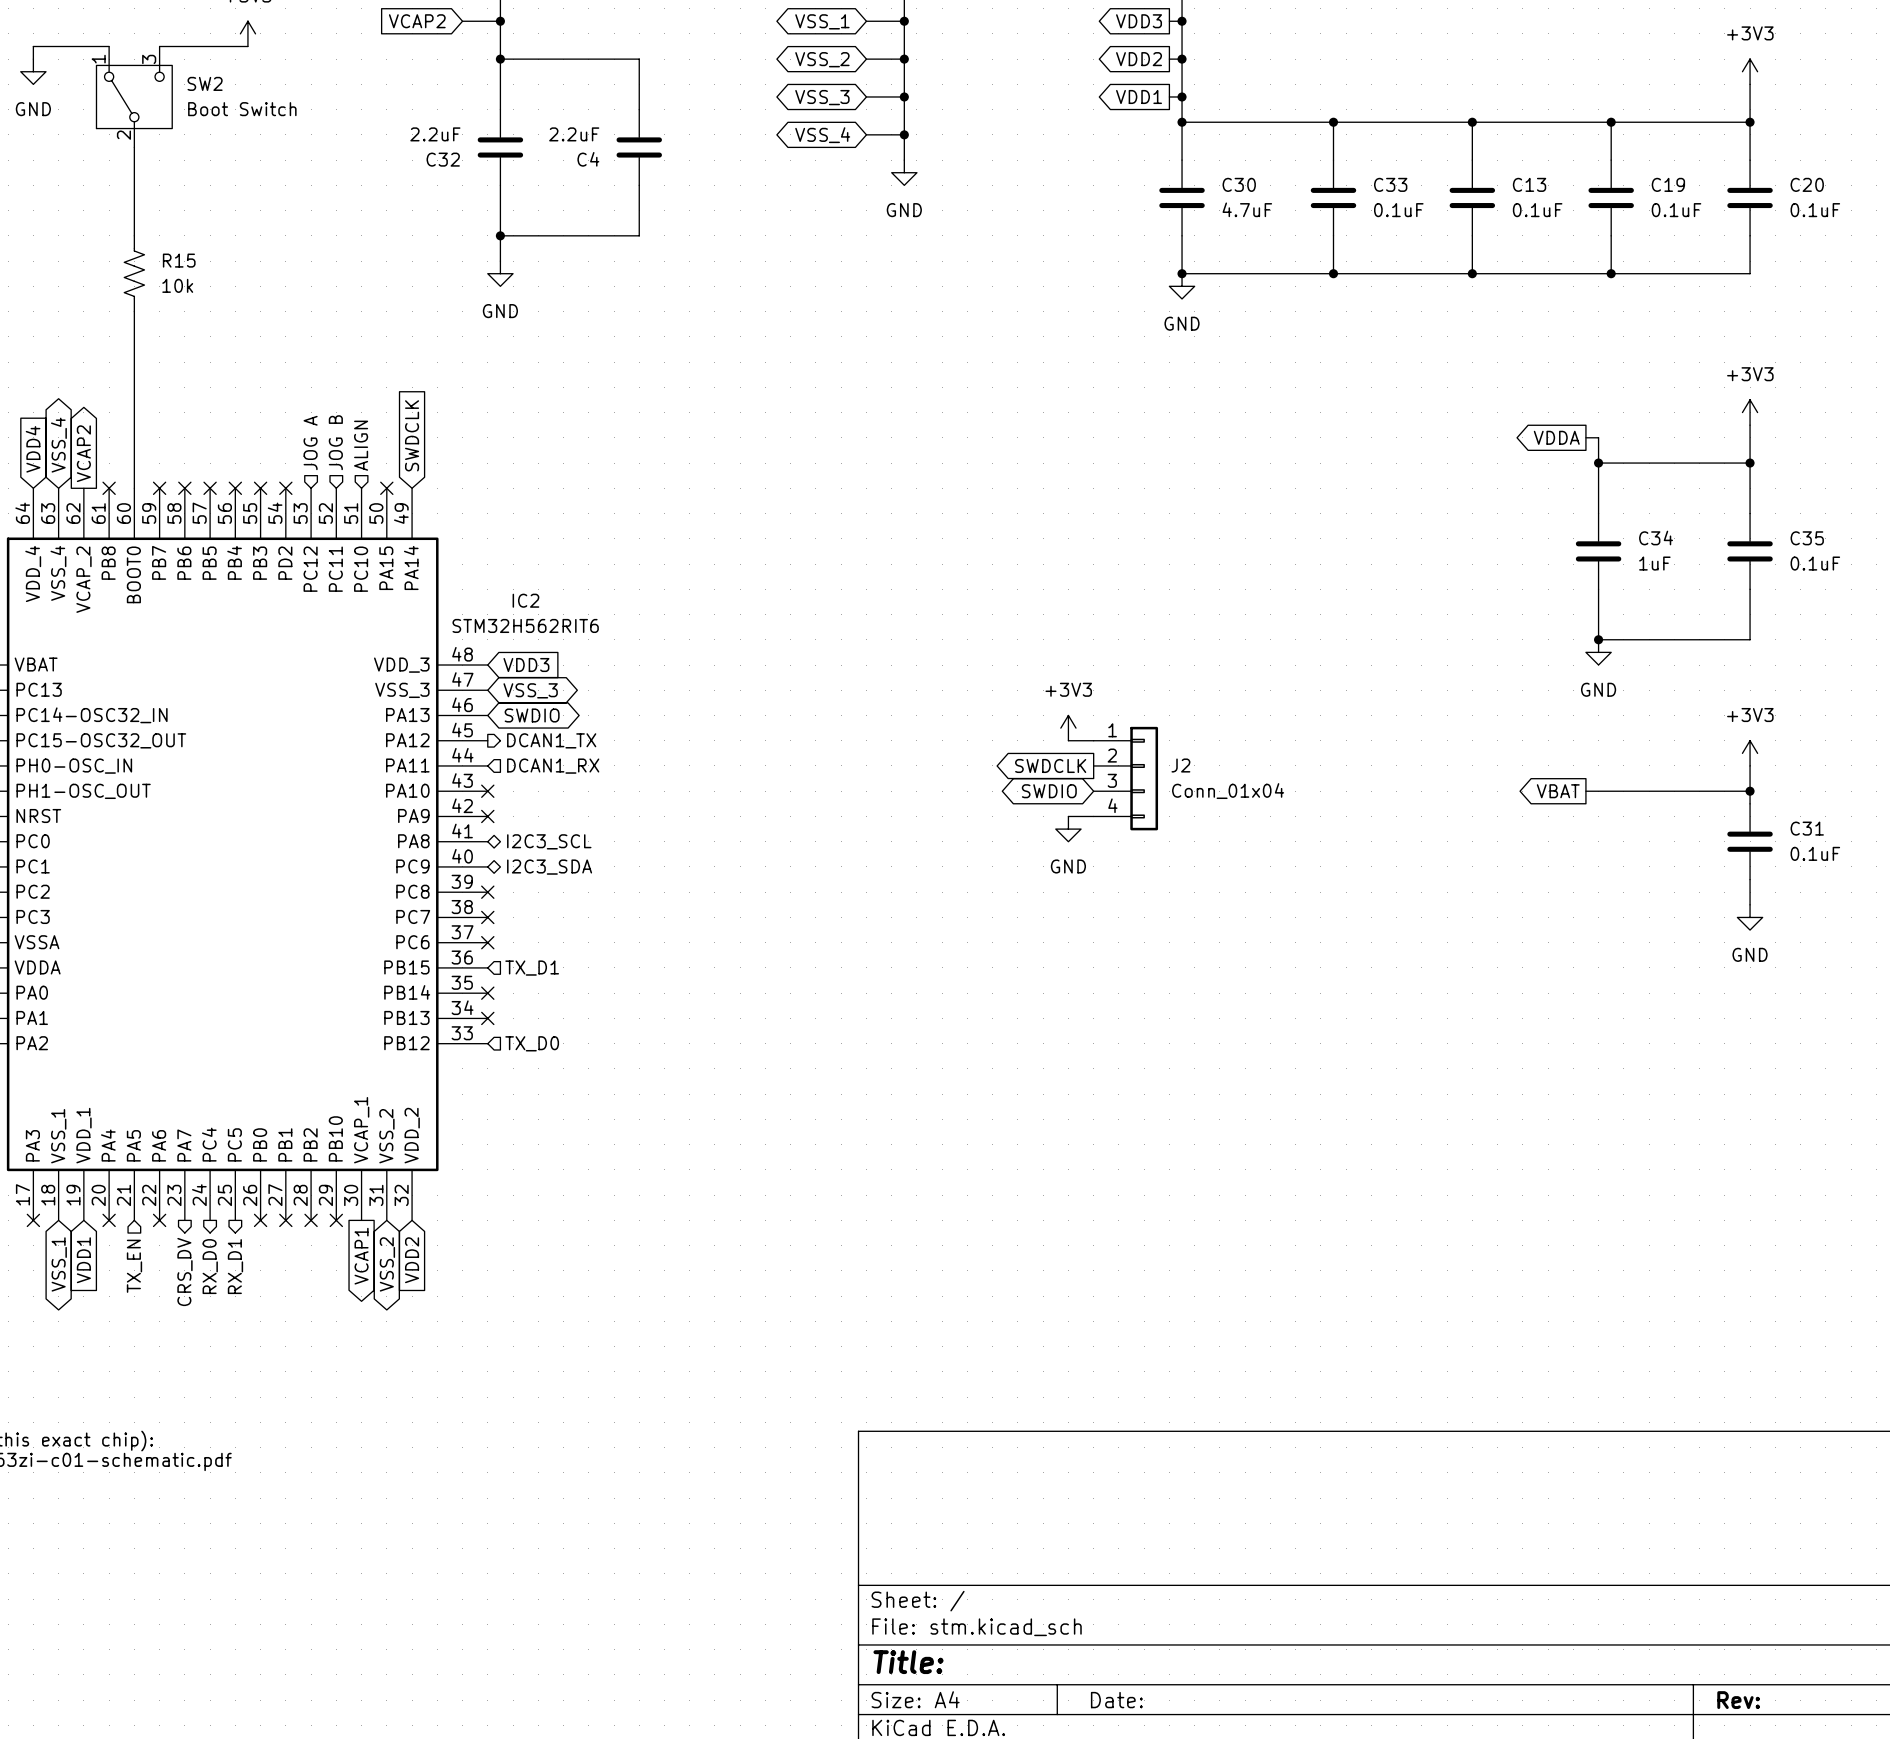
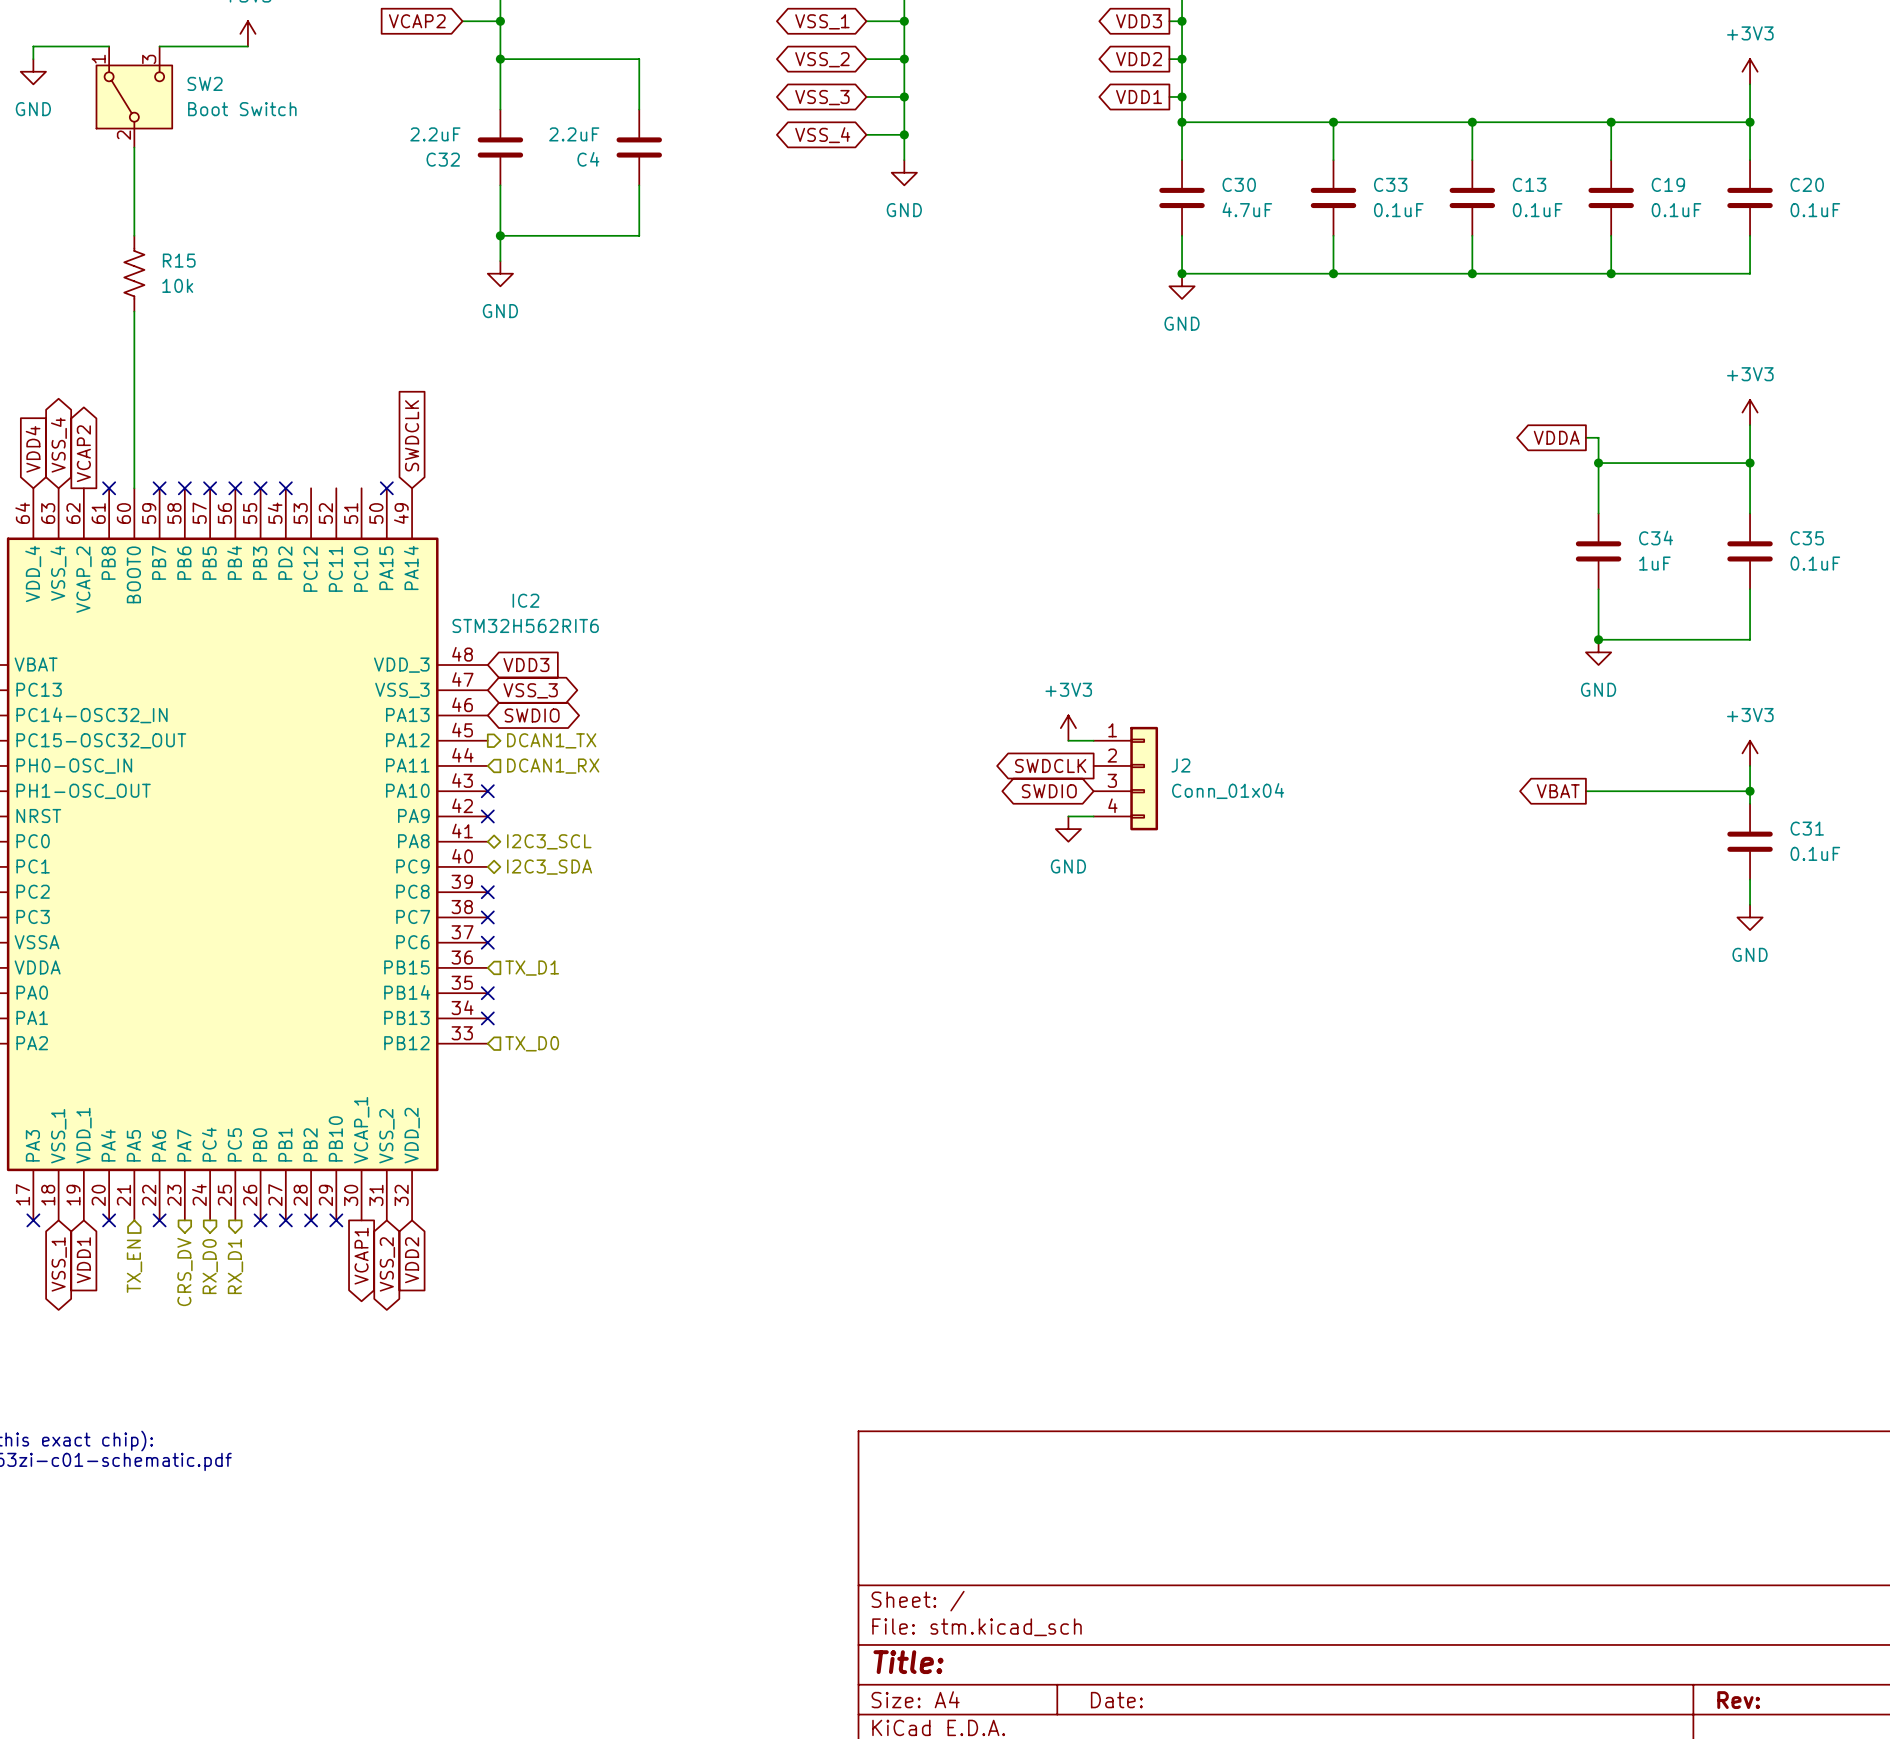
hierarchical label: JOG B (335, 442) -> none
hierarchical label: JOG A (310, 443) -> none
hierarchical label: ALIGN (361, 445) -> none

